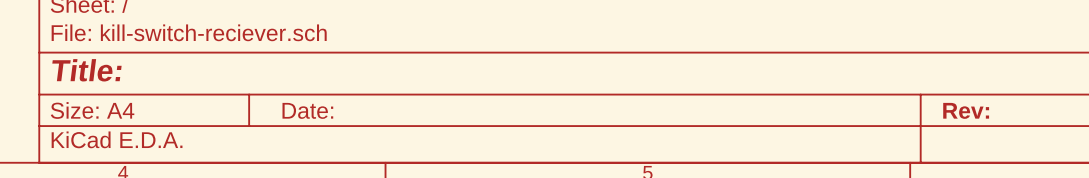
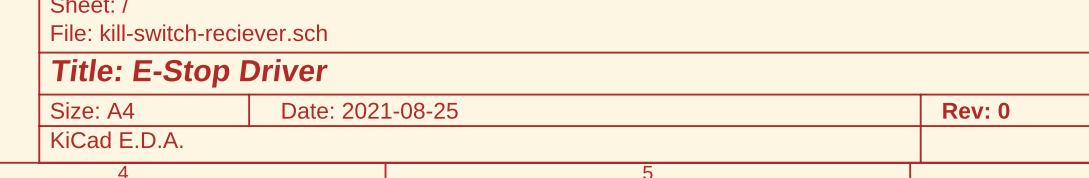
title block: Title: (86, 70) -> Title: E-Stop Driver (189, 73)
title block: Date: (307, 110) -> Date: 2021-08-25 (370, 110)
title block: Rev: (966, 110) -> Rev: 0 (976, 110)

